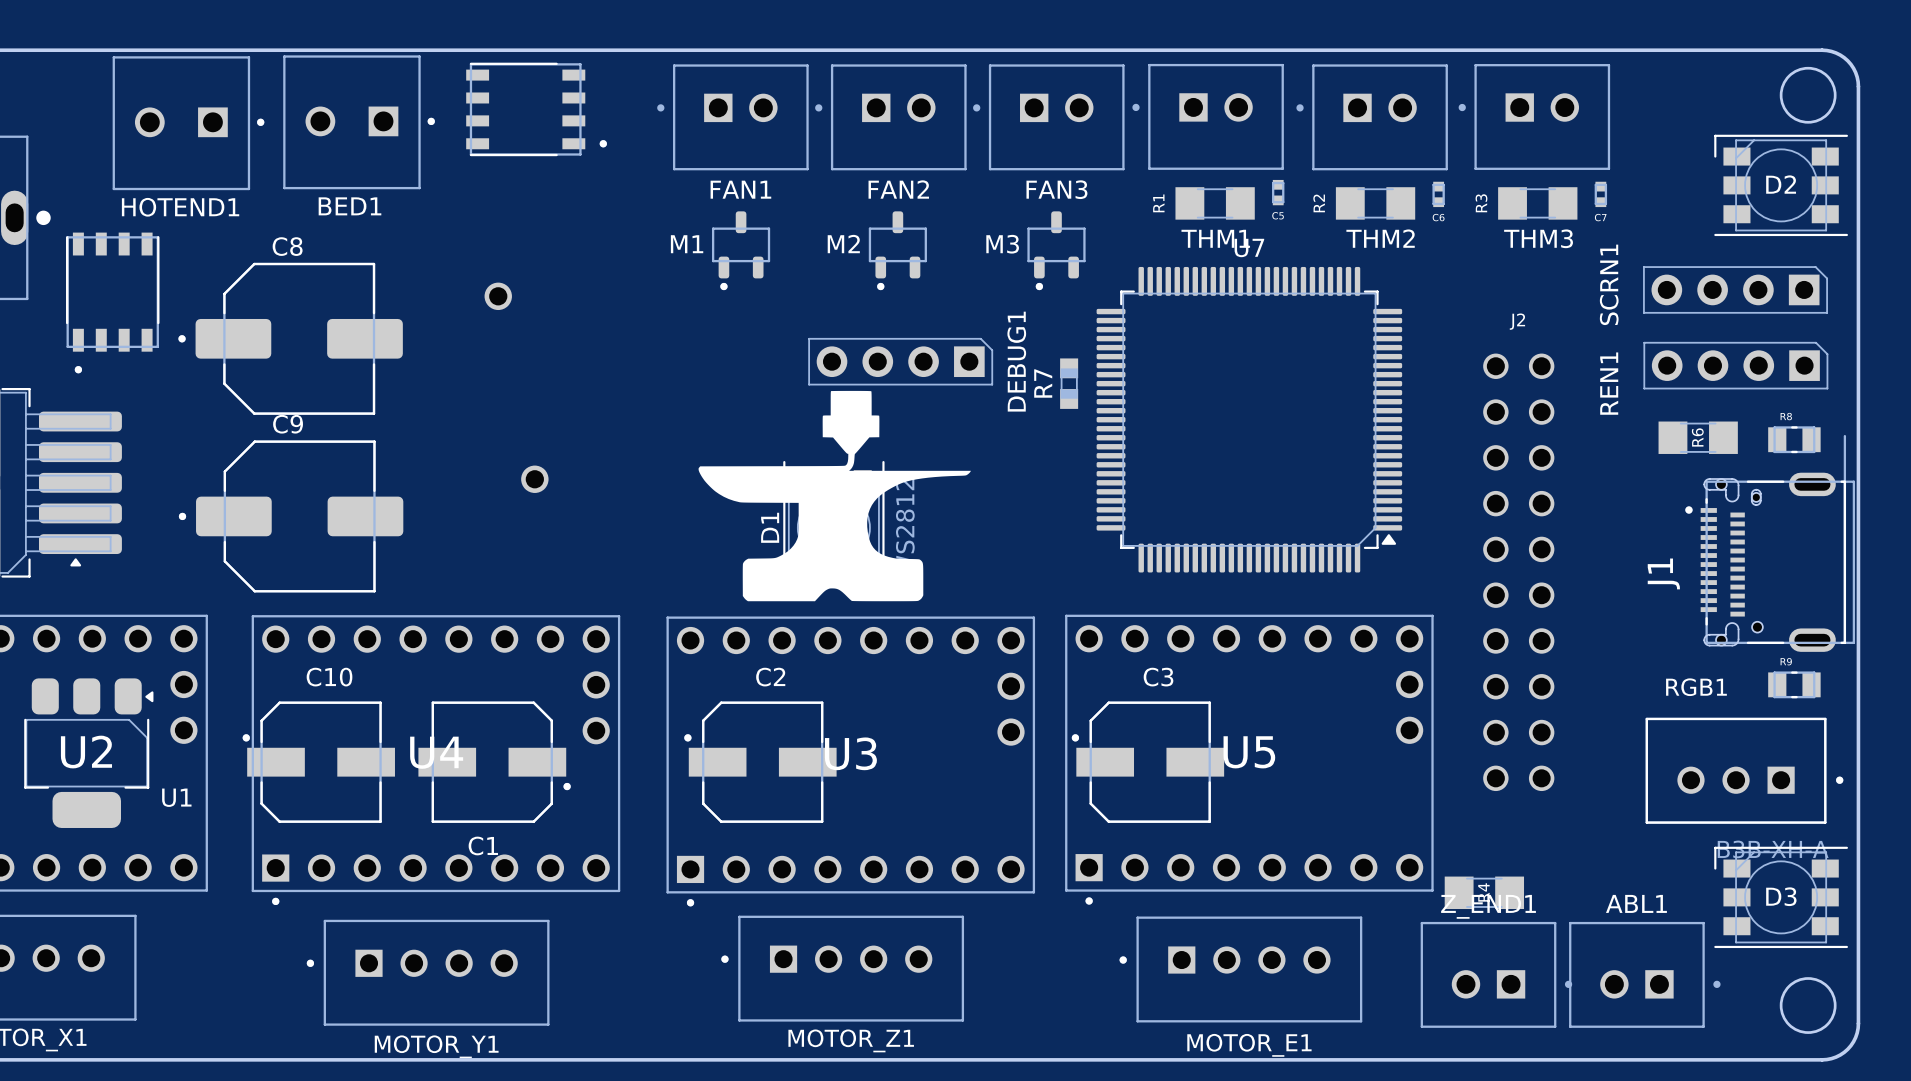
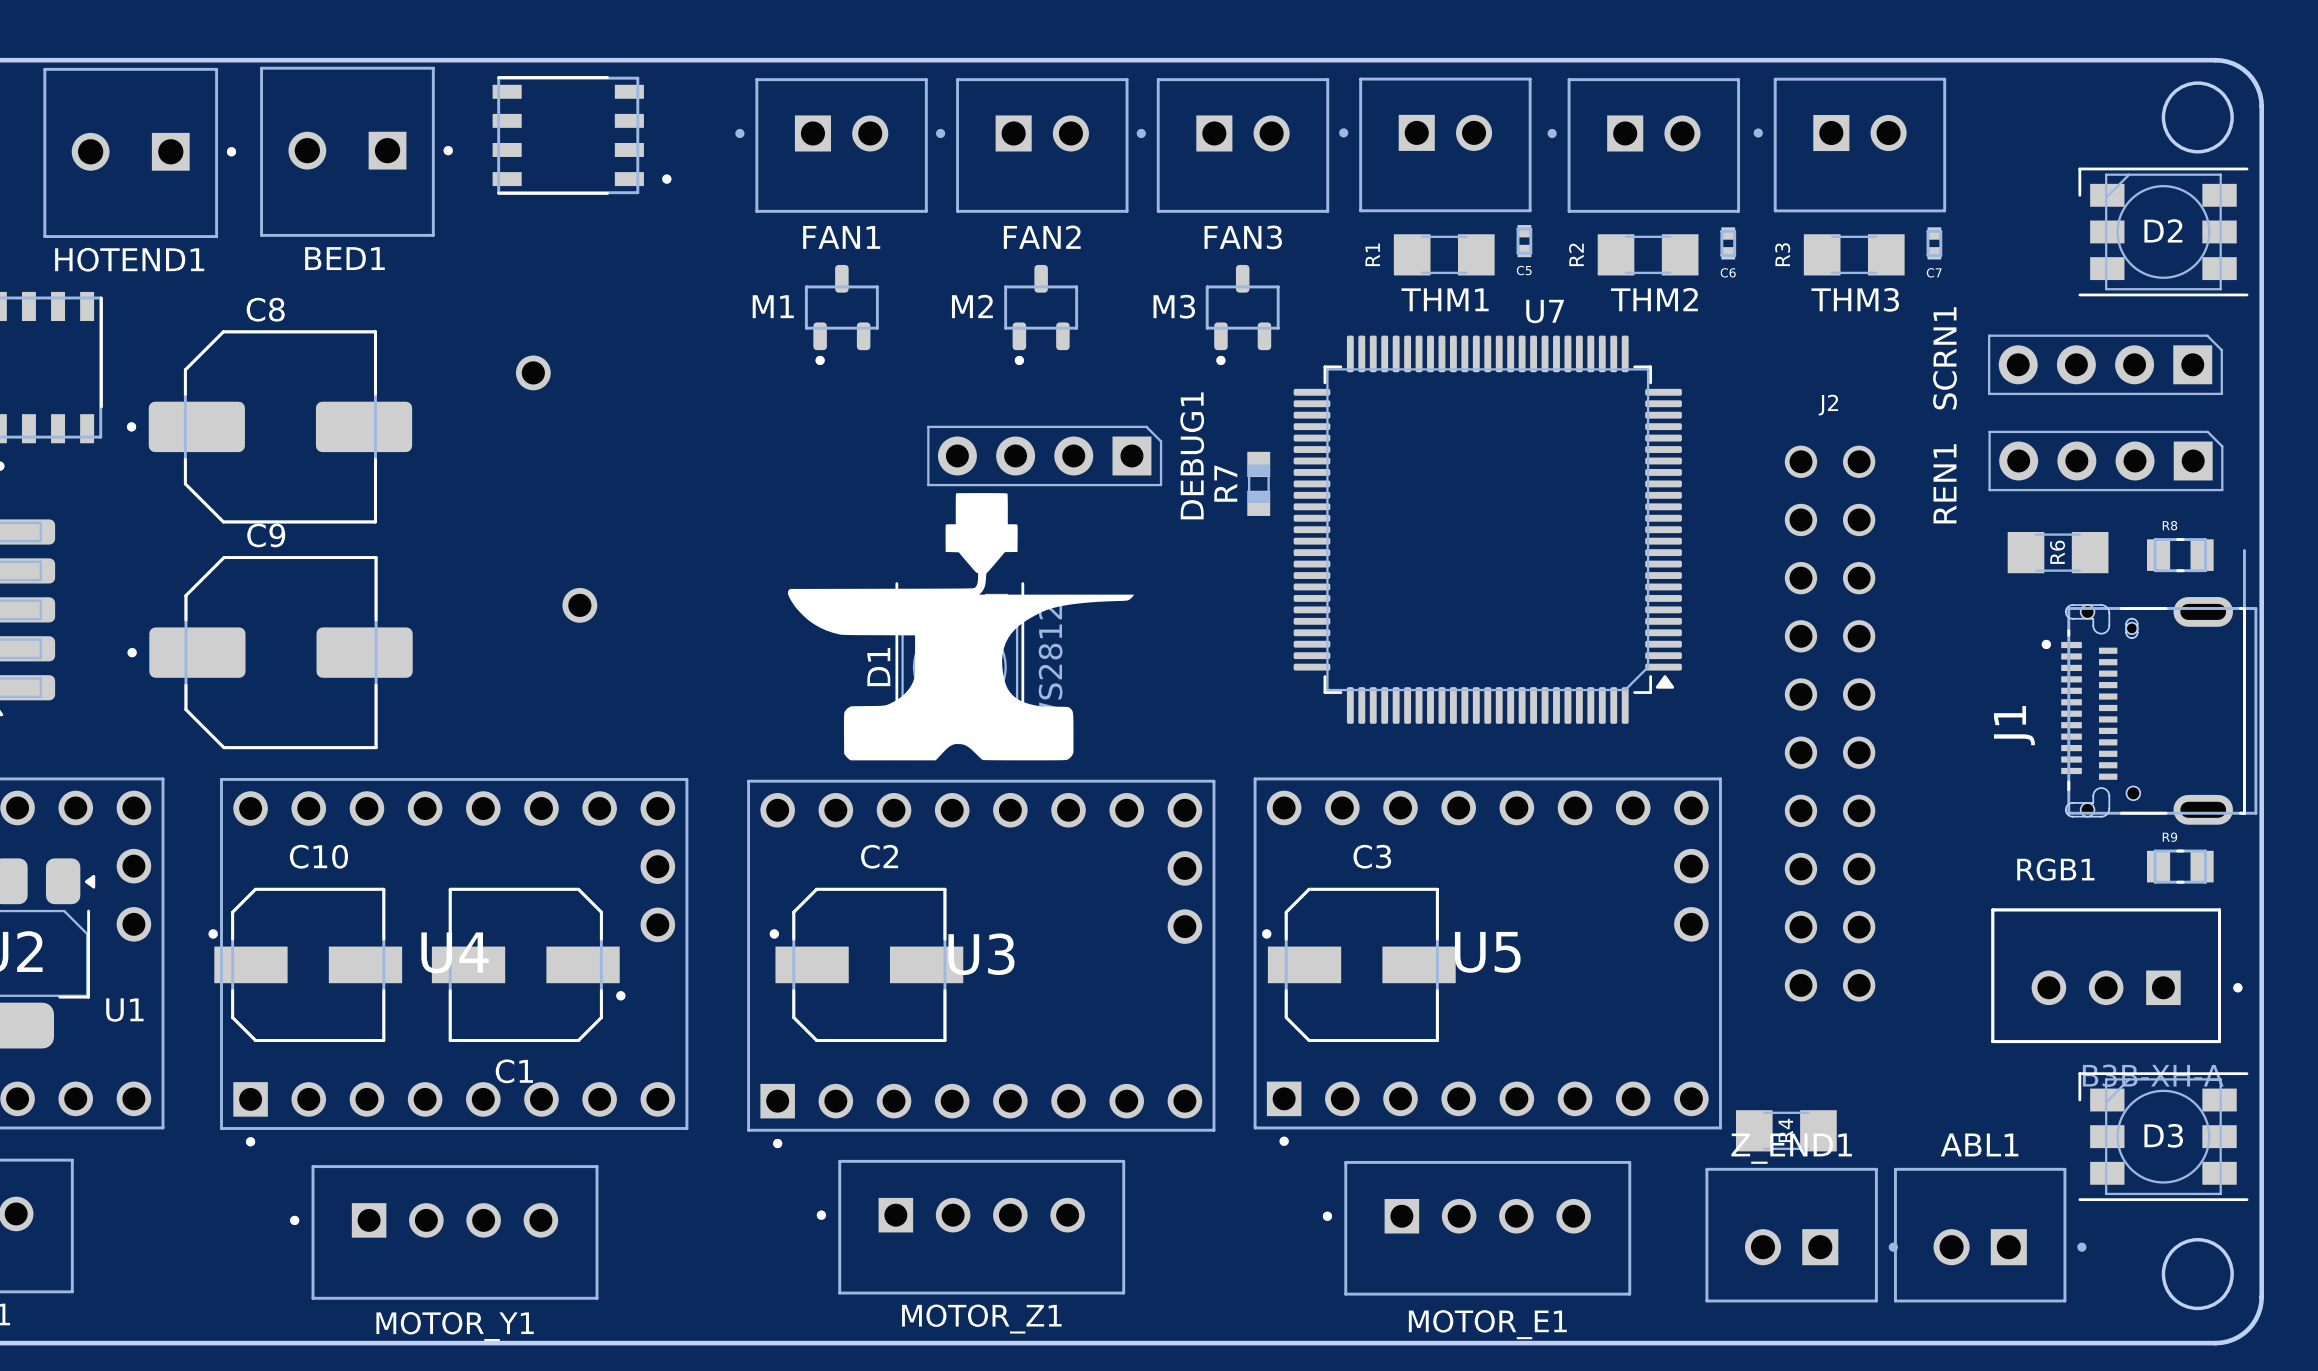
U7 name position: U7 (1249, 247) -> U7 (1545, 311)

